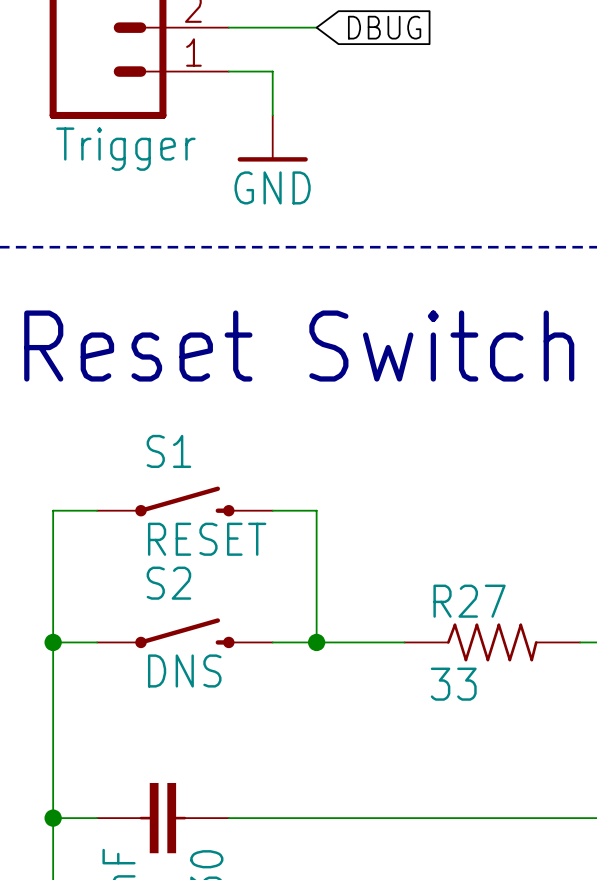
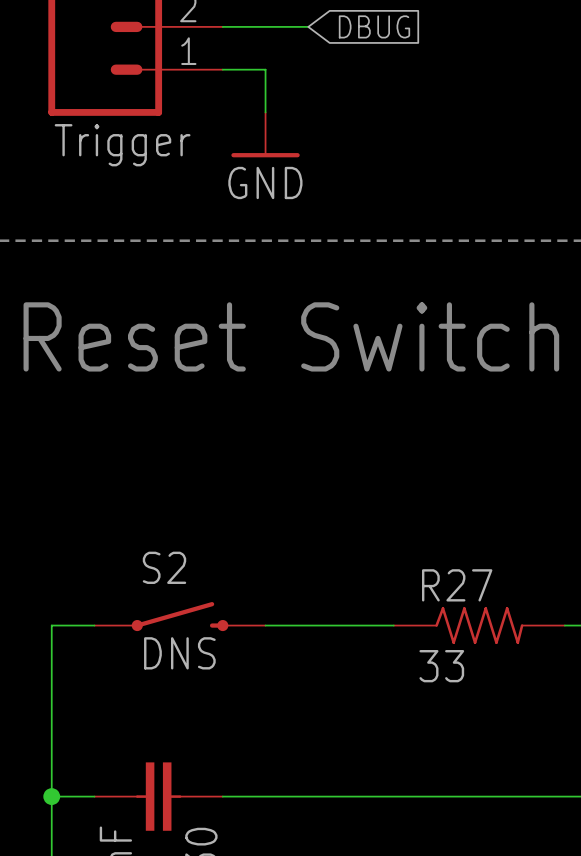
S1: RESET (184, 501) -> none
wire: (97, 510) (53, 510) (53, 642) -> none
wire: (272, 510) (316, 510) (316, 642) -> none
junction: (53, 642) -> none
junction: (316, 642) -> none

